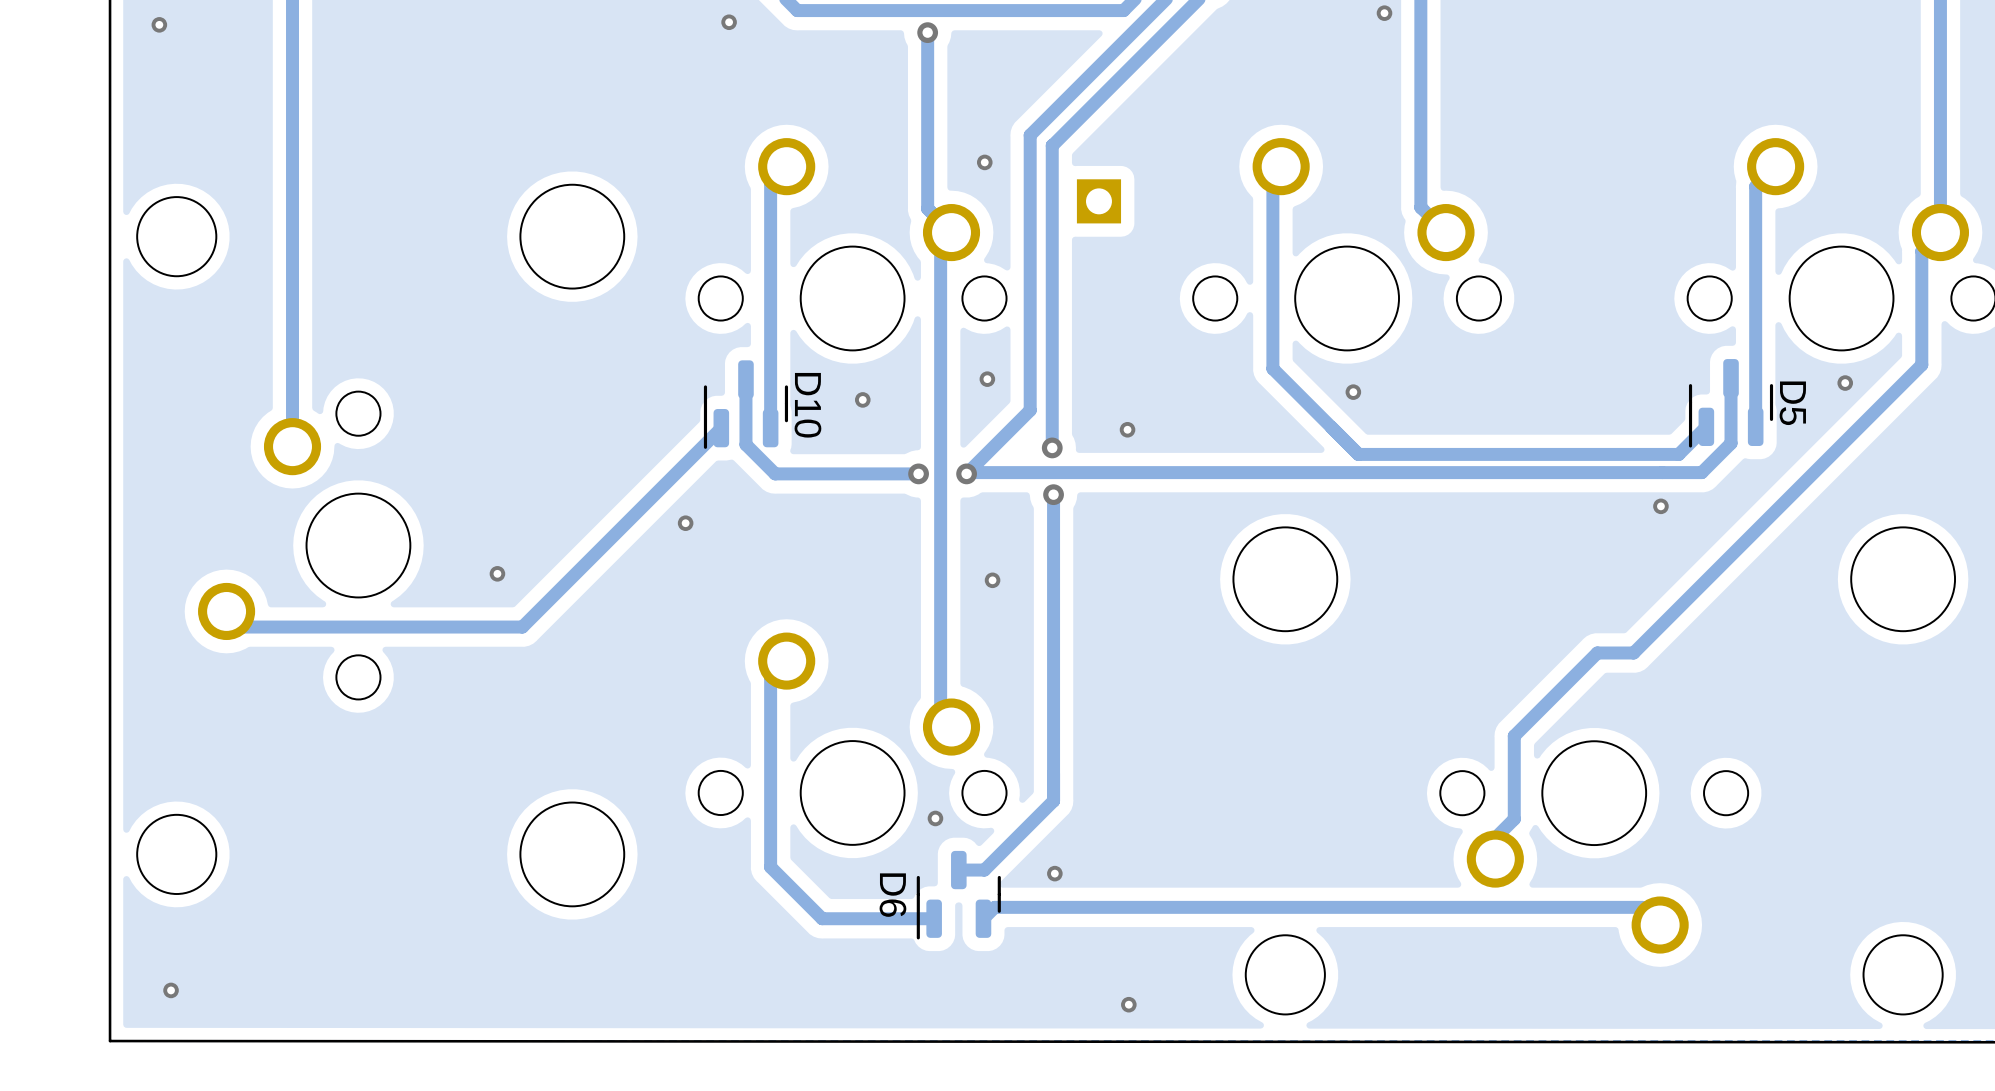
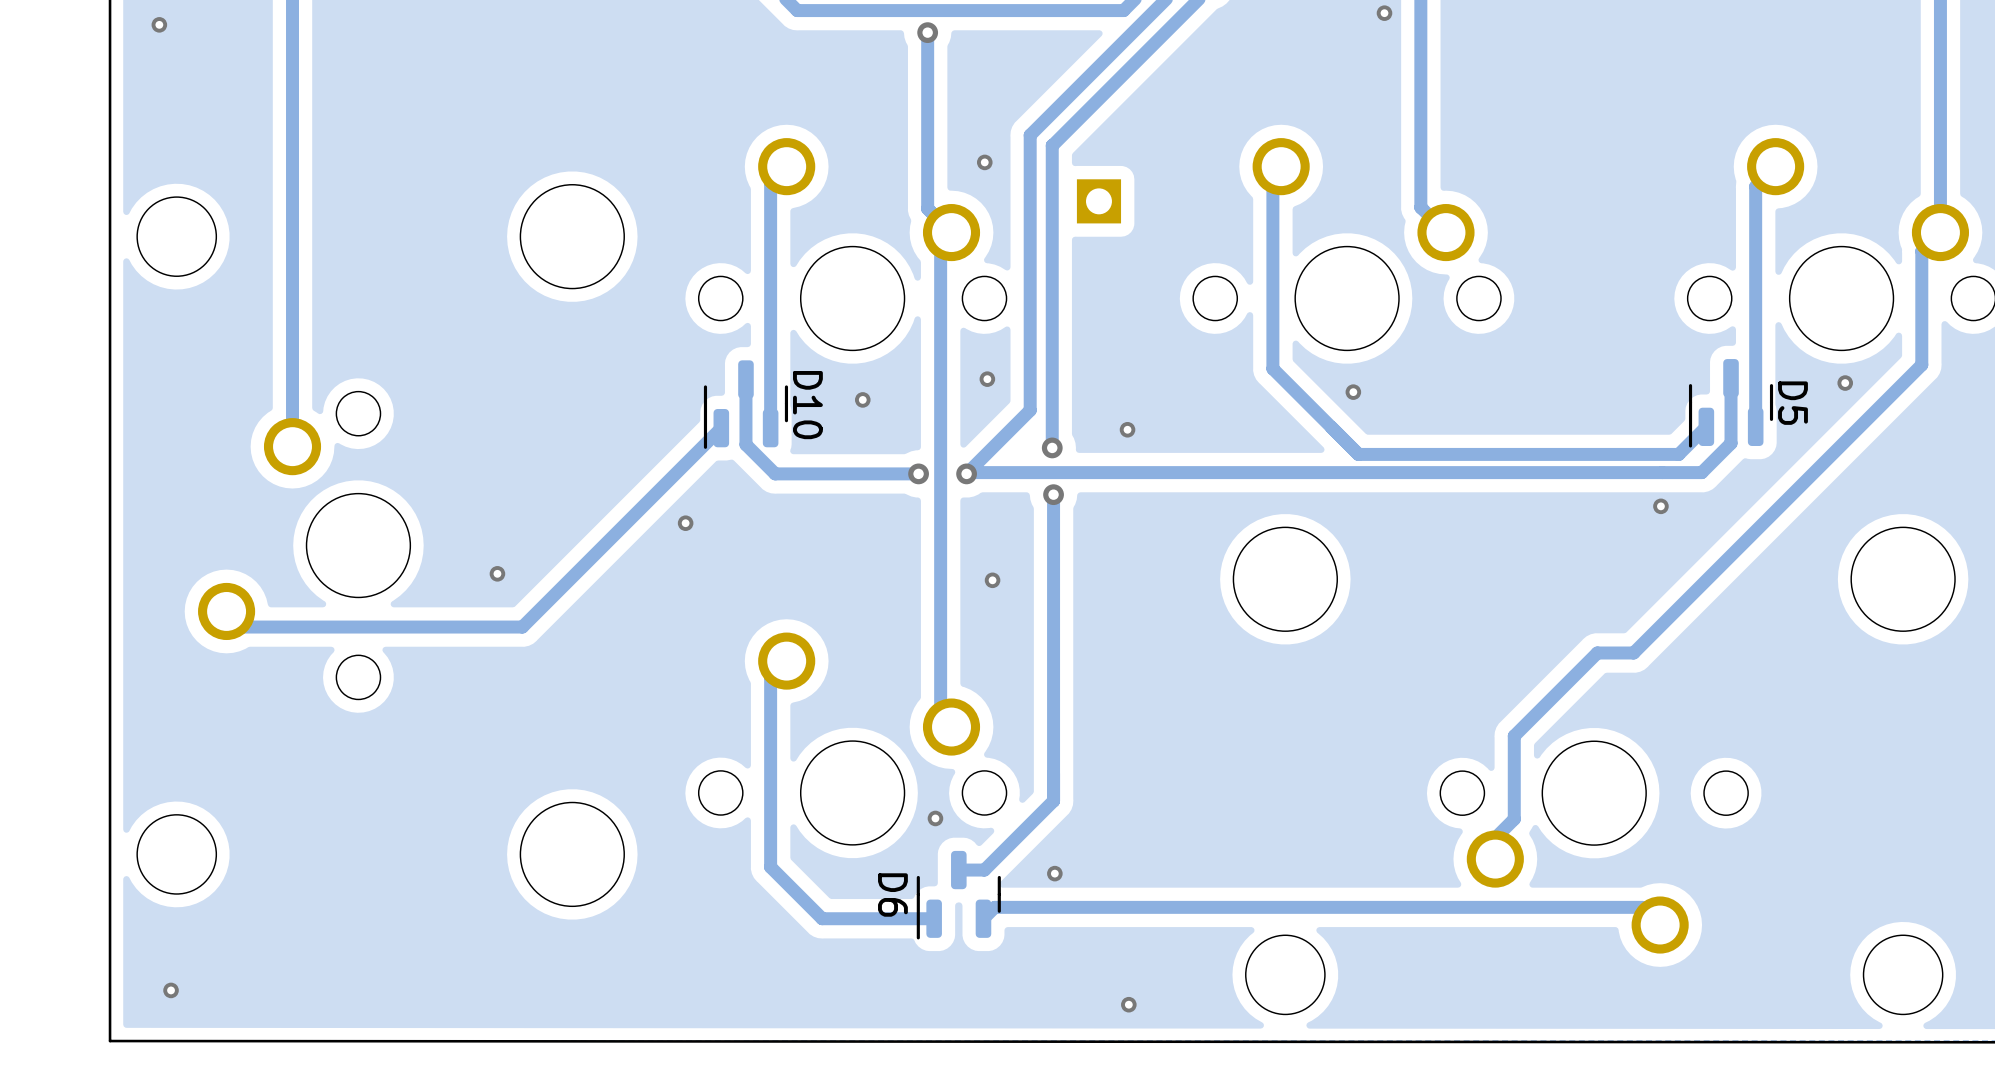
via: (729, 22) -> none

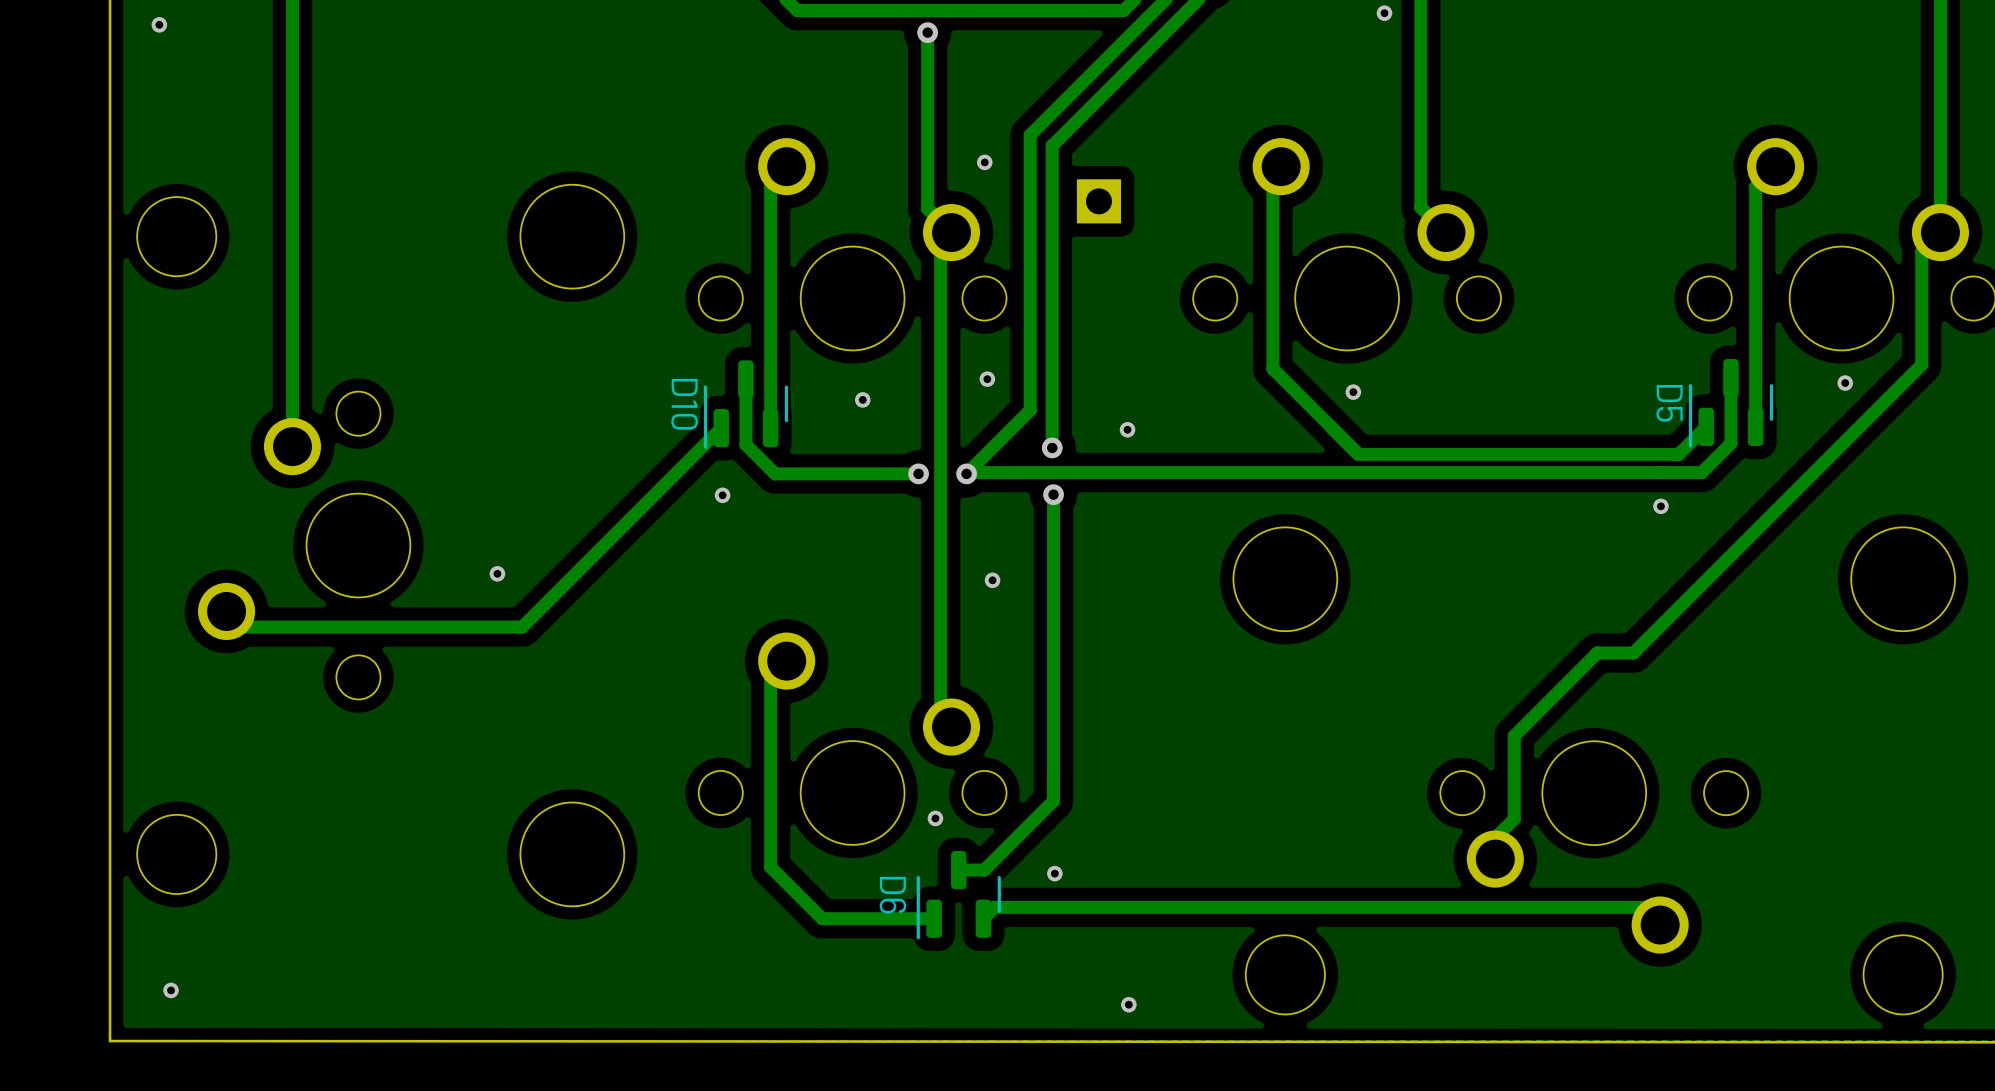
D5 name position: D5 (1792, 403) -> D5 (1669, 403)
D10 name position: D10 (807, 405) -> D10 (684, 404)
via position: (685, 523) -> (722, 495)

